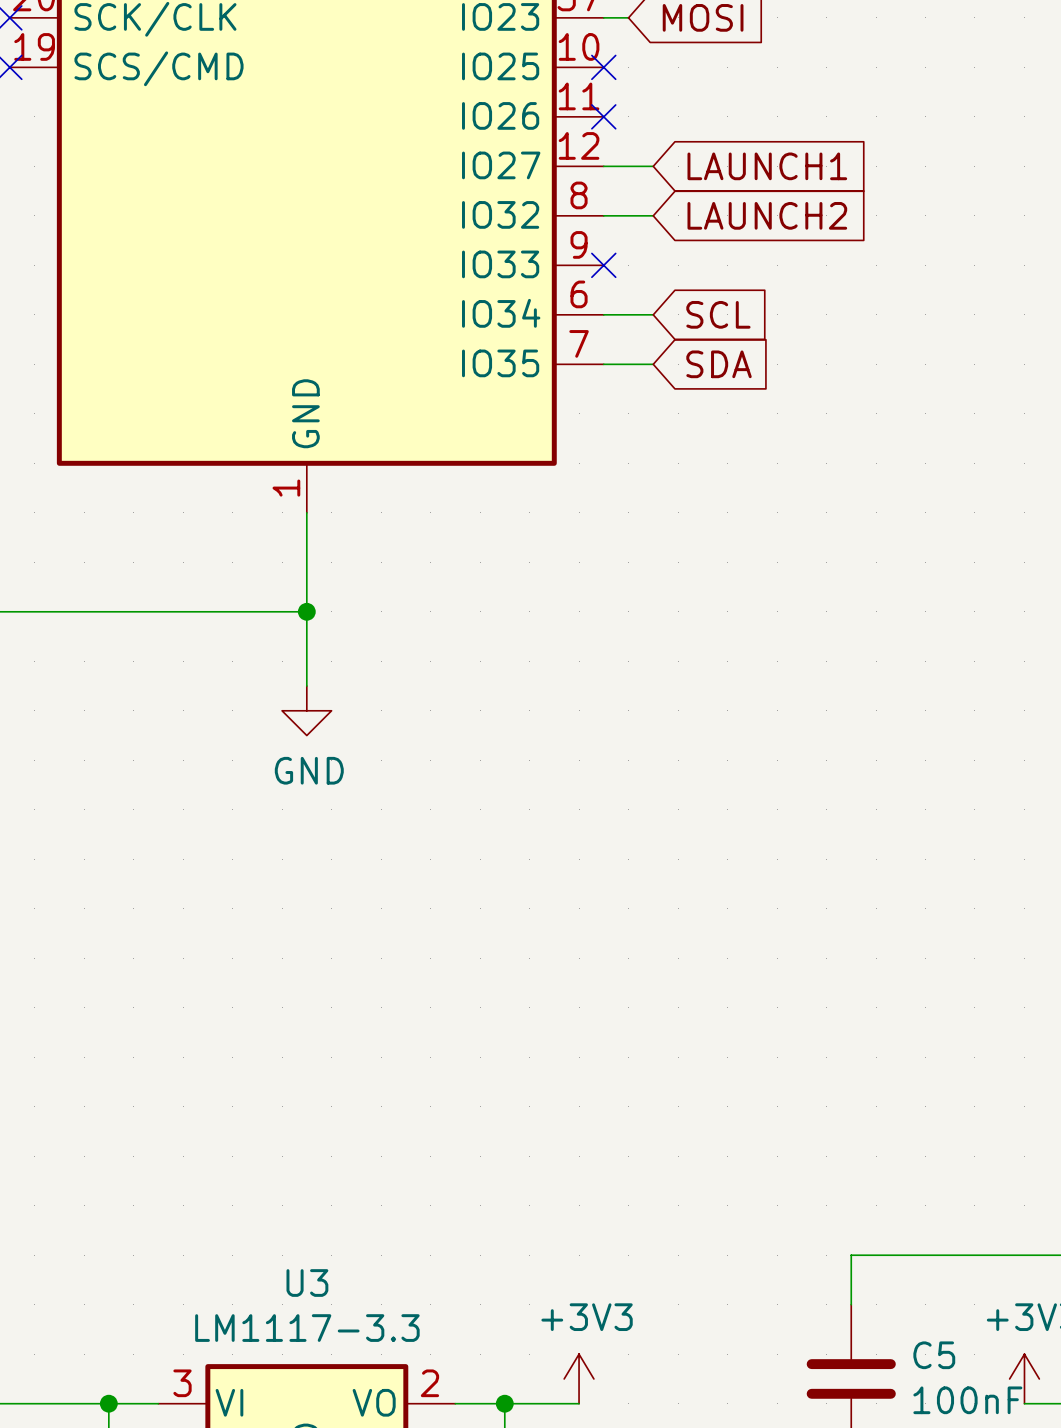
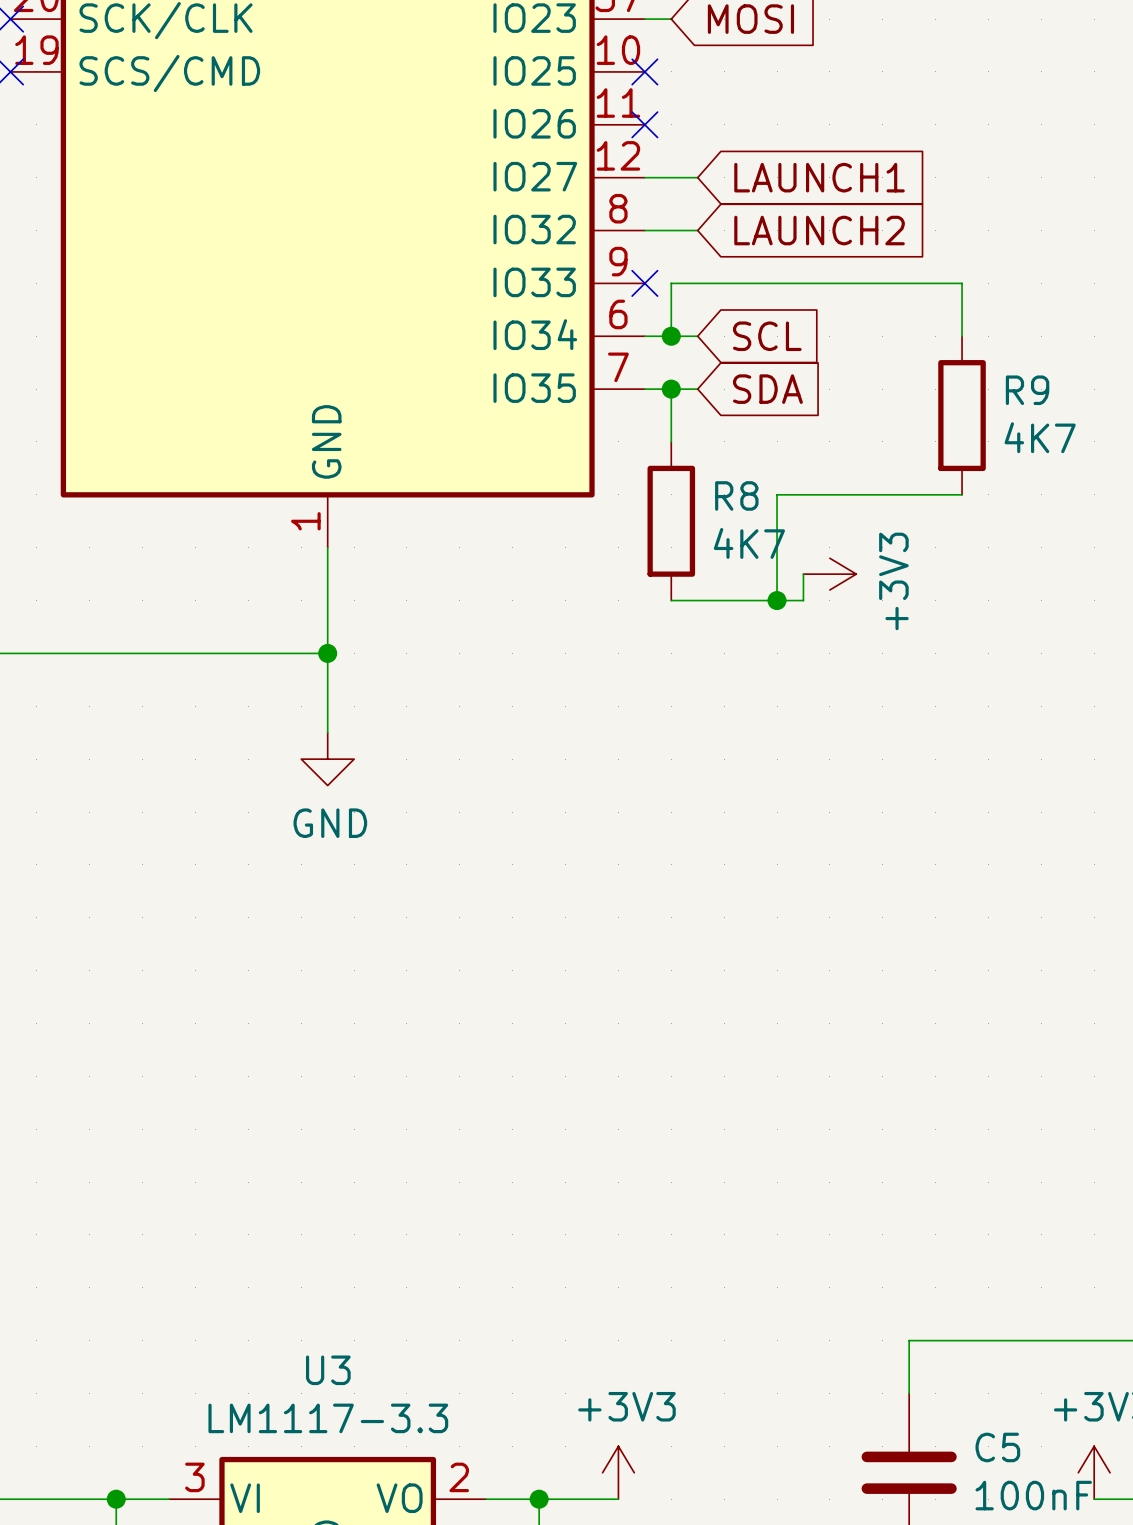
wire: none -> (671, 336) (671, 283) (962, 283) (962, 336)
junction: none -> (671, 336)
wire: none -> (671, 389) (671, 441)
junction: none -> (671, 389)
R9: none -> 4K7 (962, 415)
wire: none -> (962, 494) (777, 494) (777, 600)
R8: none -> 4K7 (671, 521)
wire: none -> (803, 574) (803, 600) (671, 600)
power symbol: none -> +3V3 (829, 574)
junction: none -> (777, 600)

